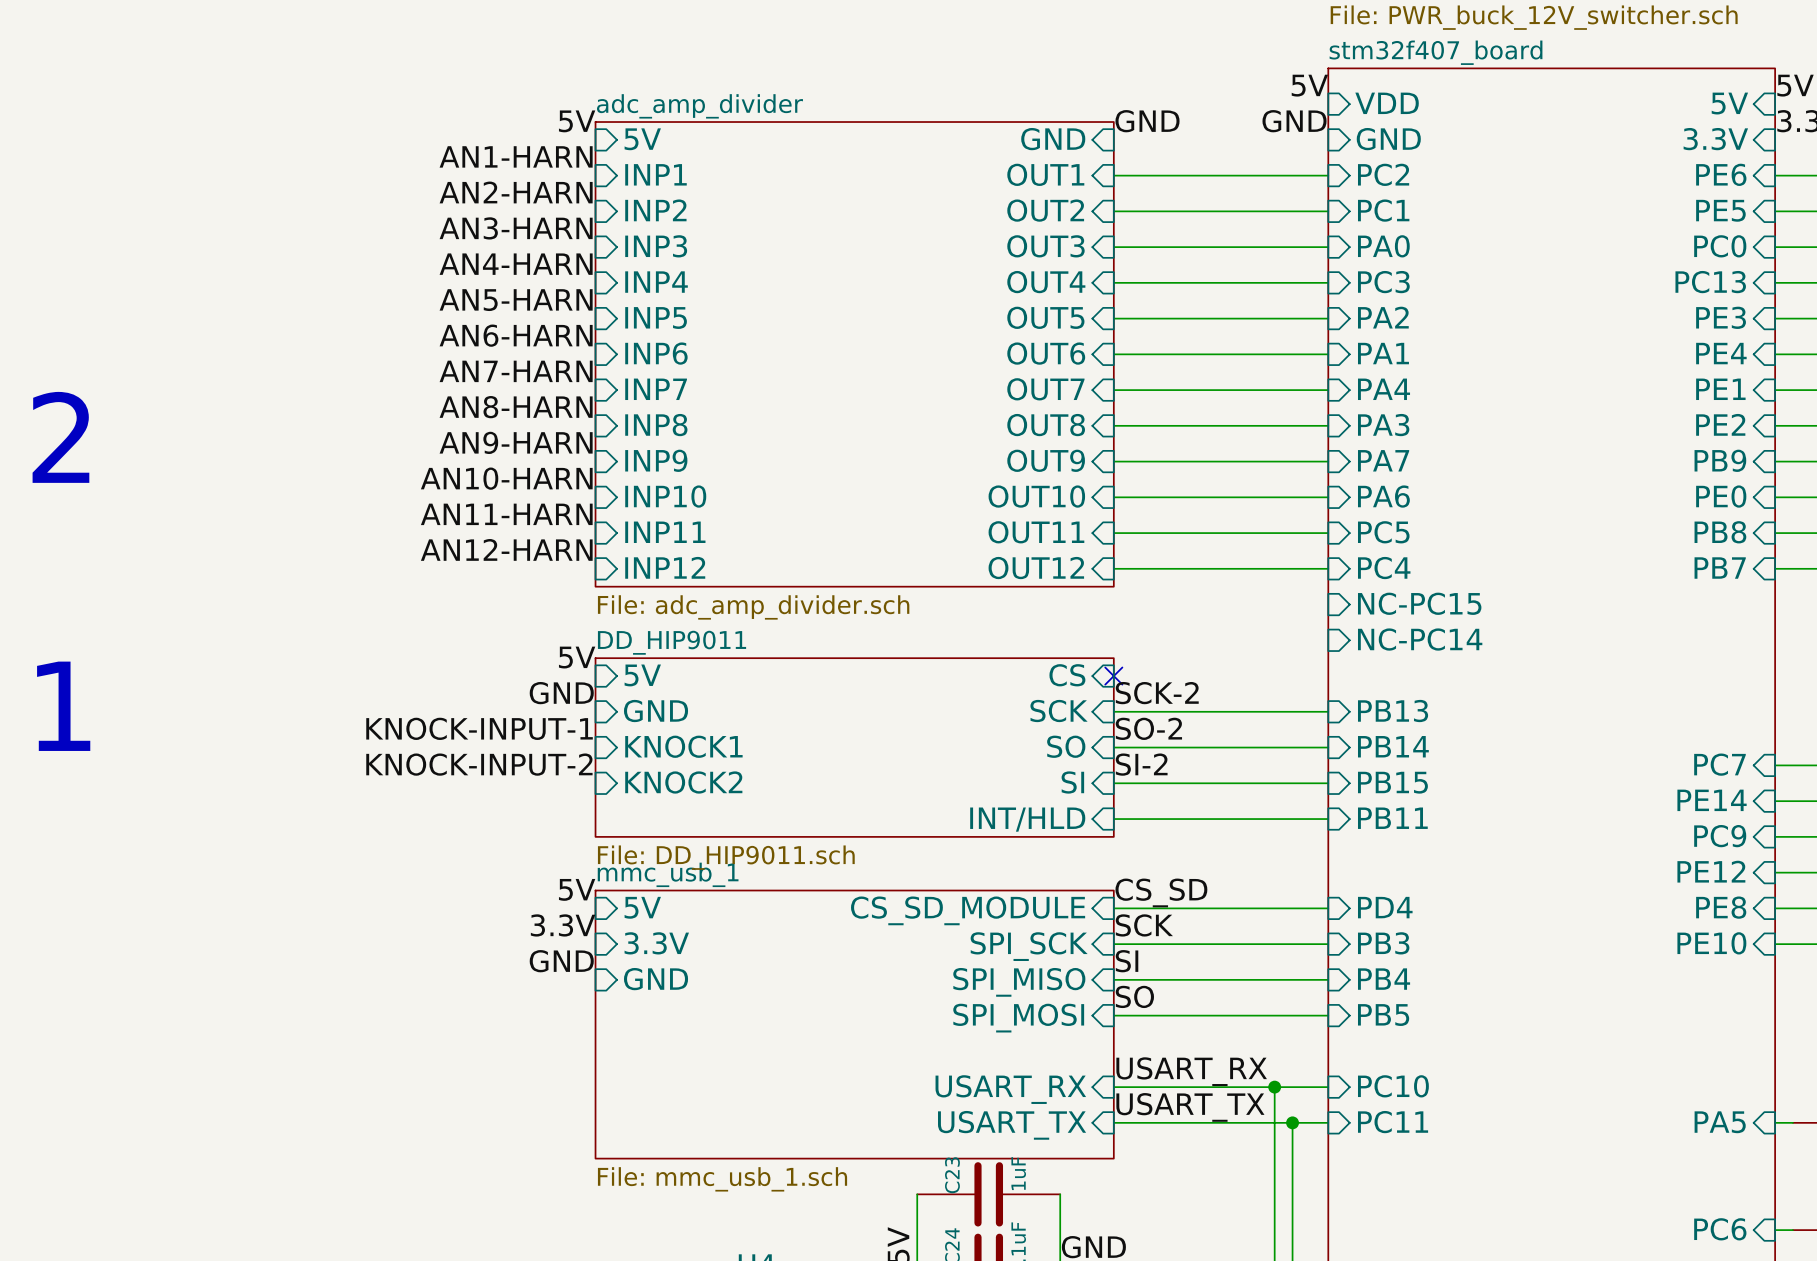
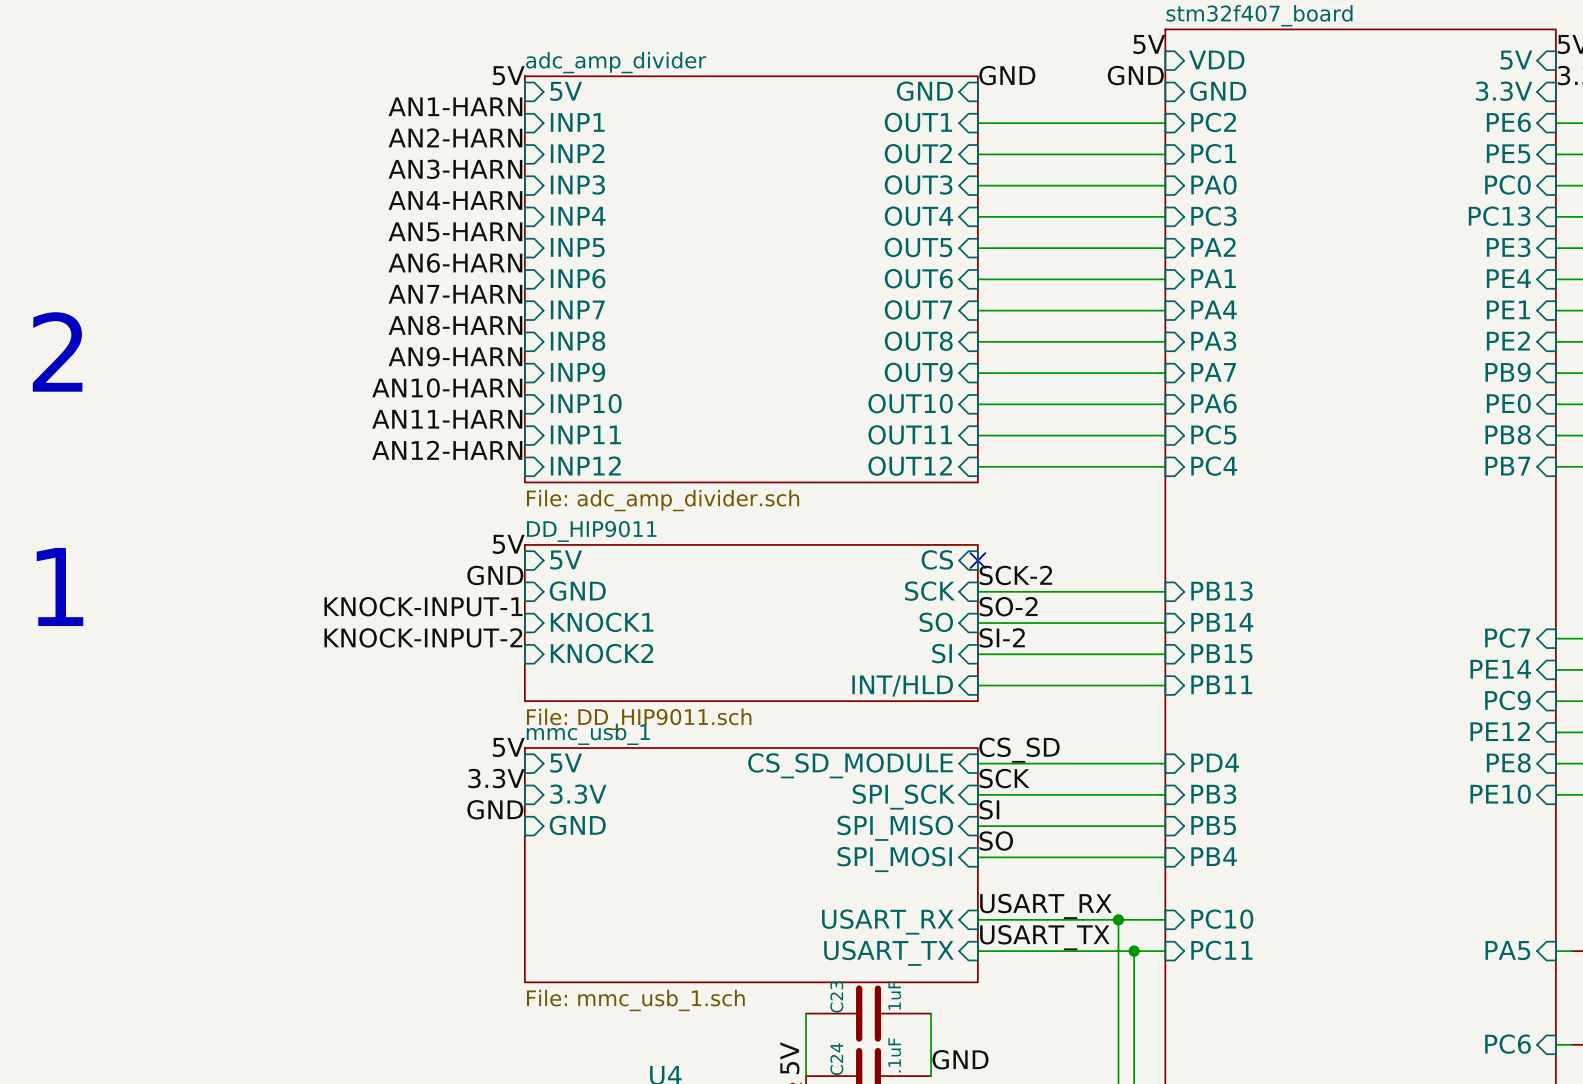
sheet pin: NC-PC15 (1419, 603) -> none
sheet pin: NC-PC14 (1420, 639) -> none
sheet pin: PB4 (1384, 979) -> PB5 (1213, 825)
sheet pin: PB5 (1383, 1015) -> PB4 (1214, 856)

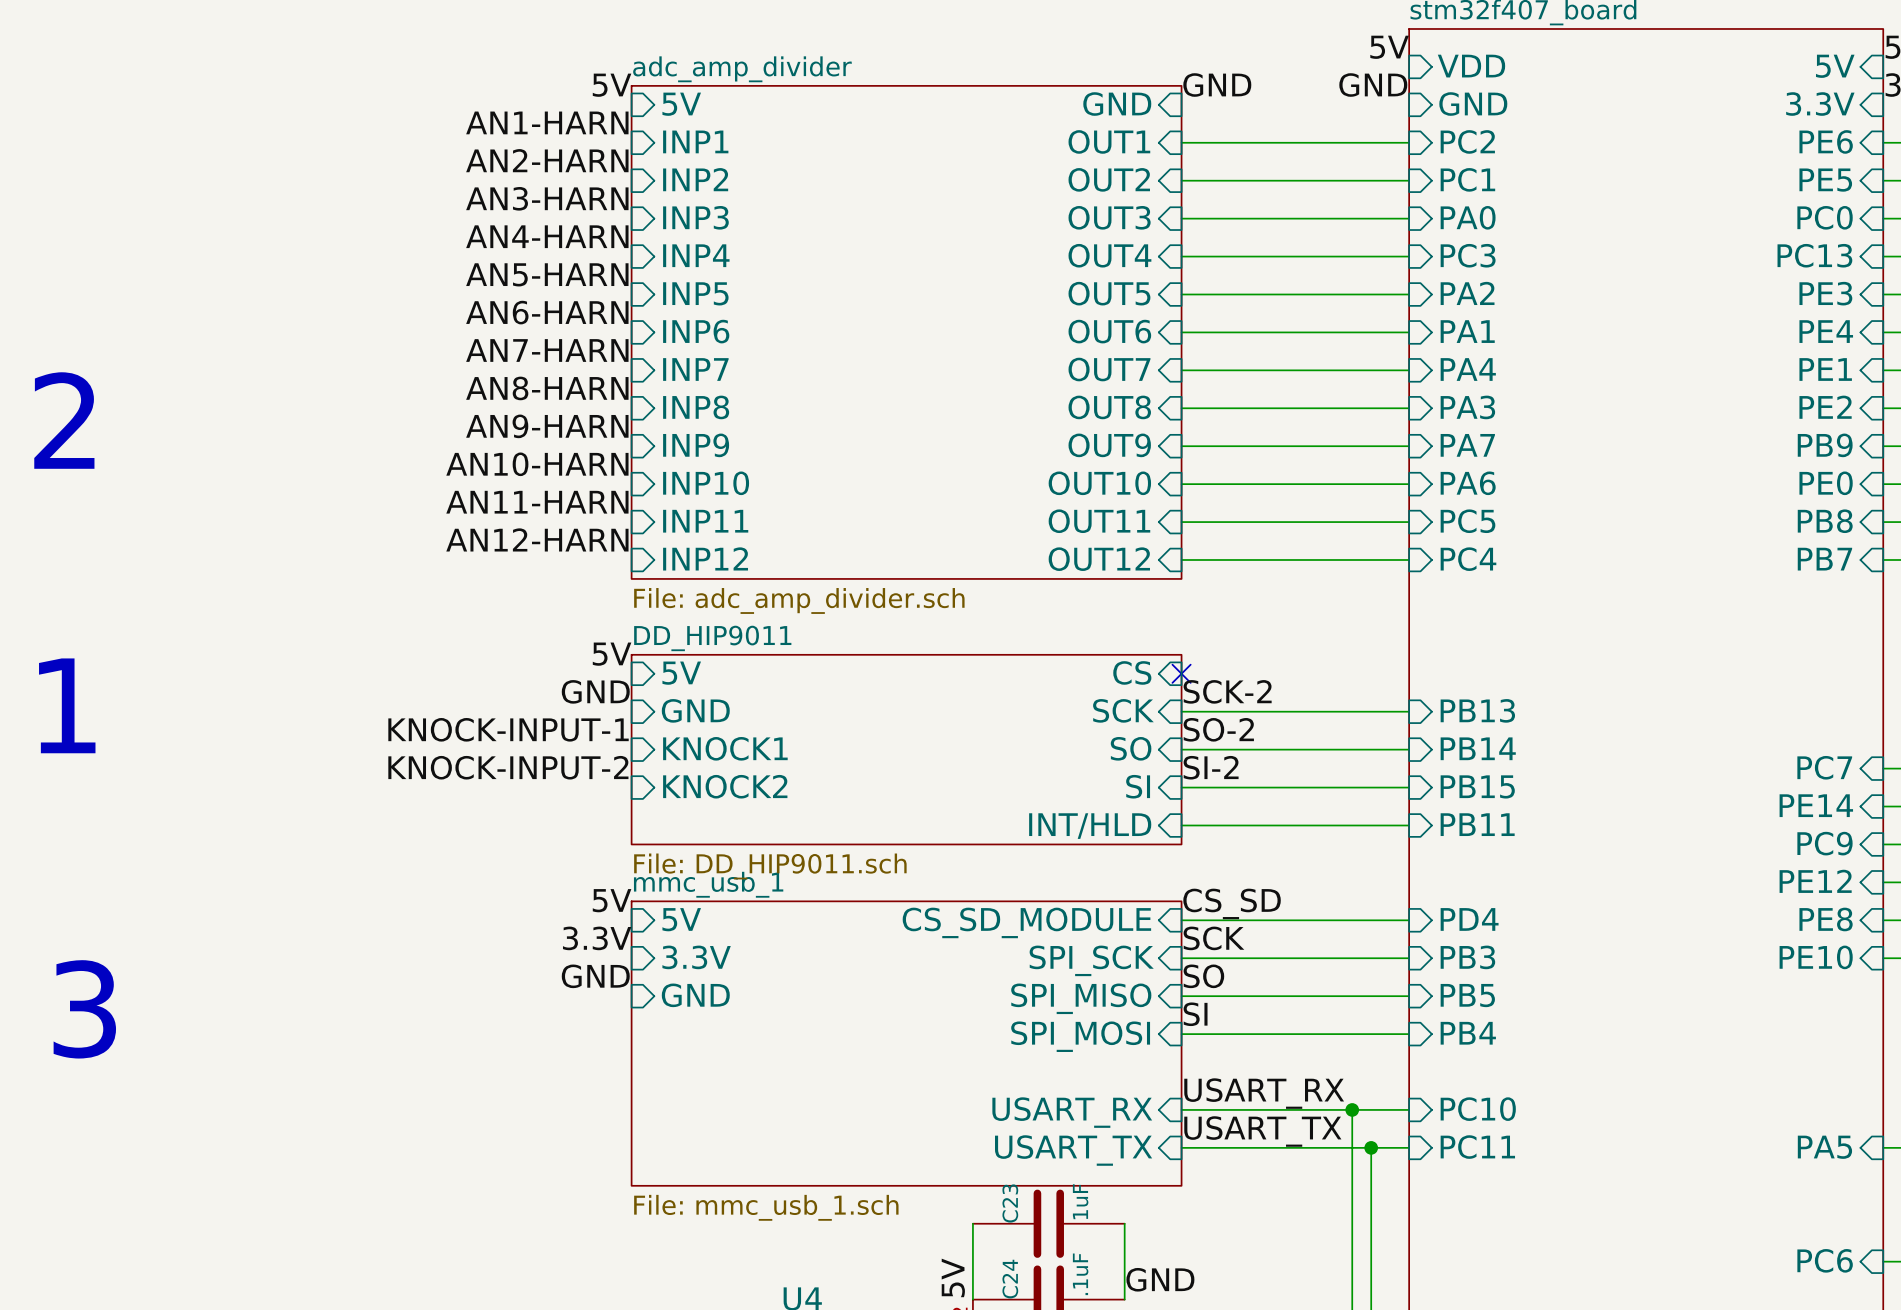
label: SI (989, 809) -> SO (1203, 976)
text: none -> 3 (84, 1009)
label: SO (996, 841) -> SI (1195, 1014)

